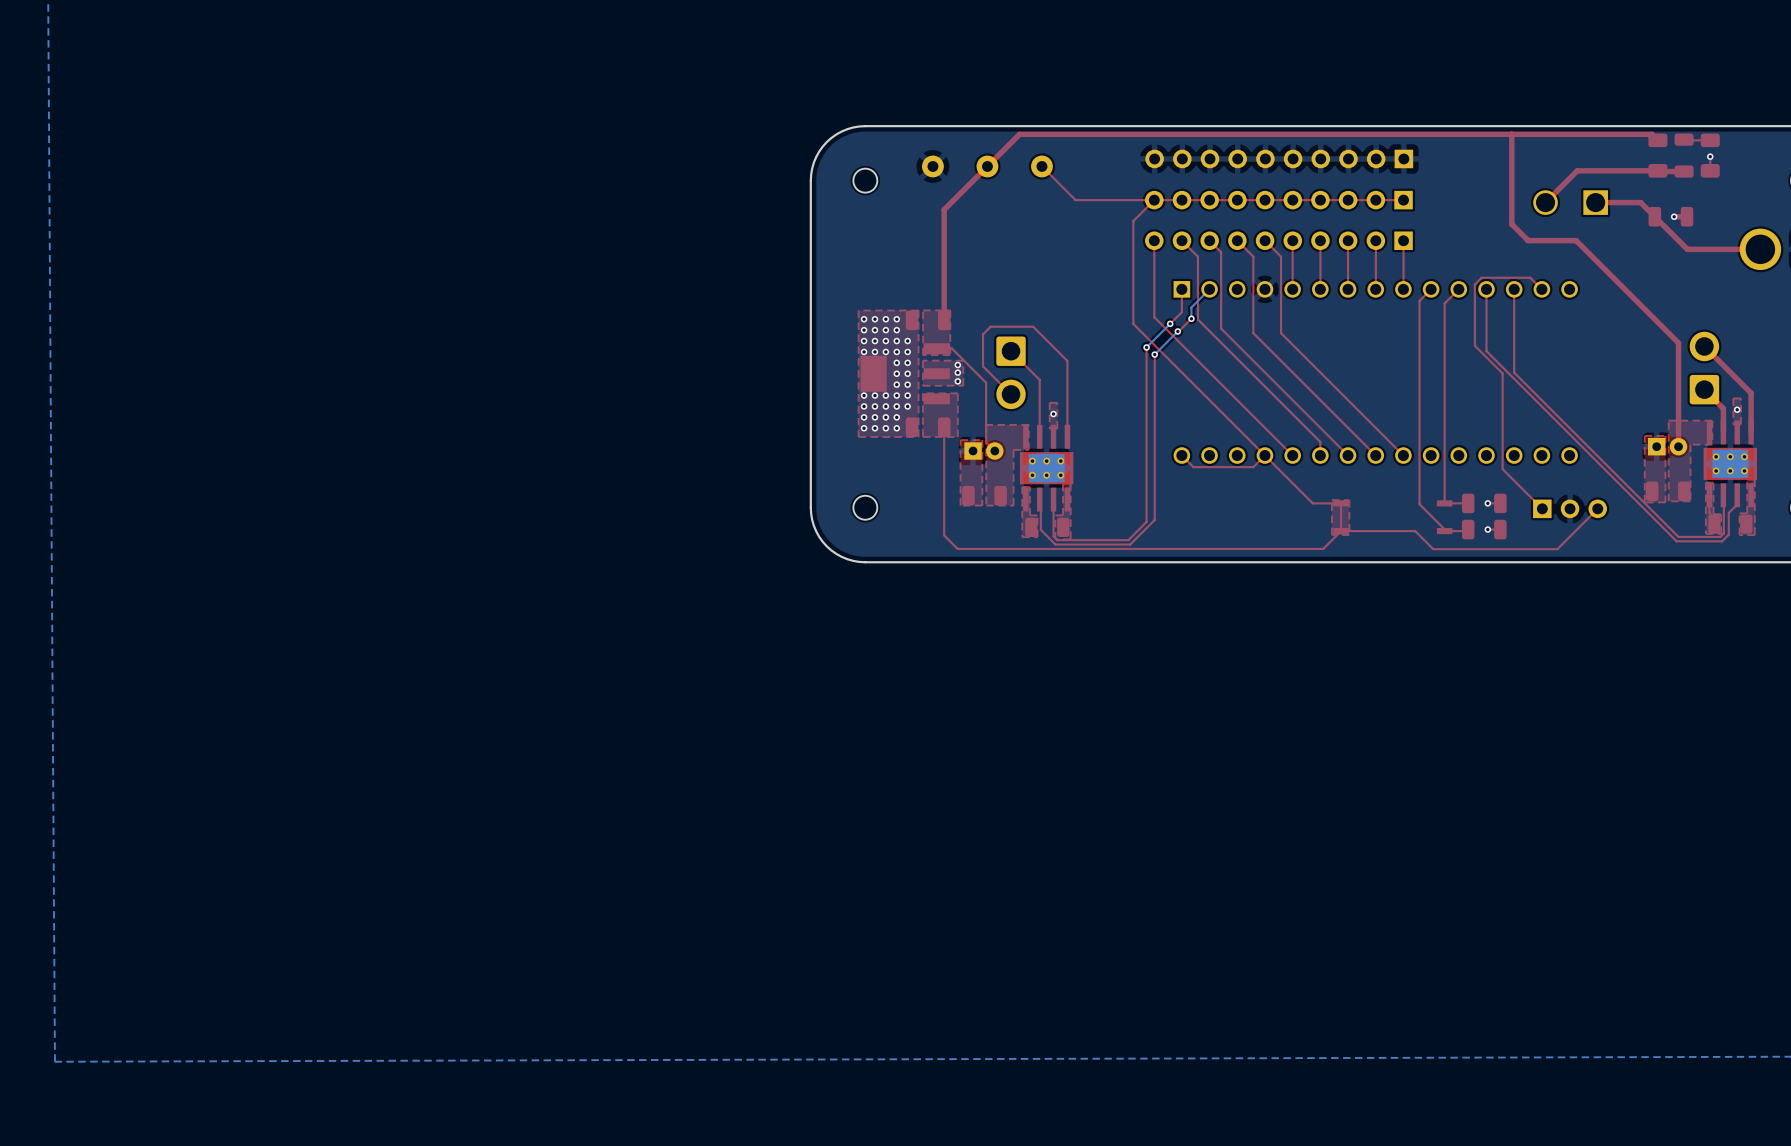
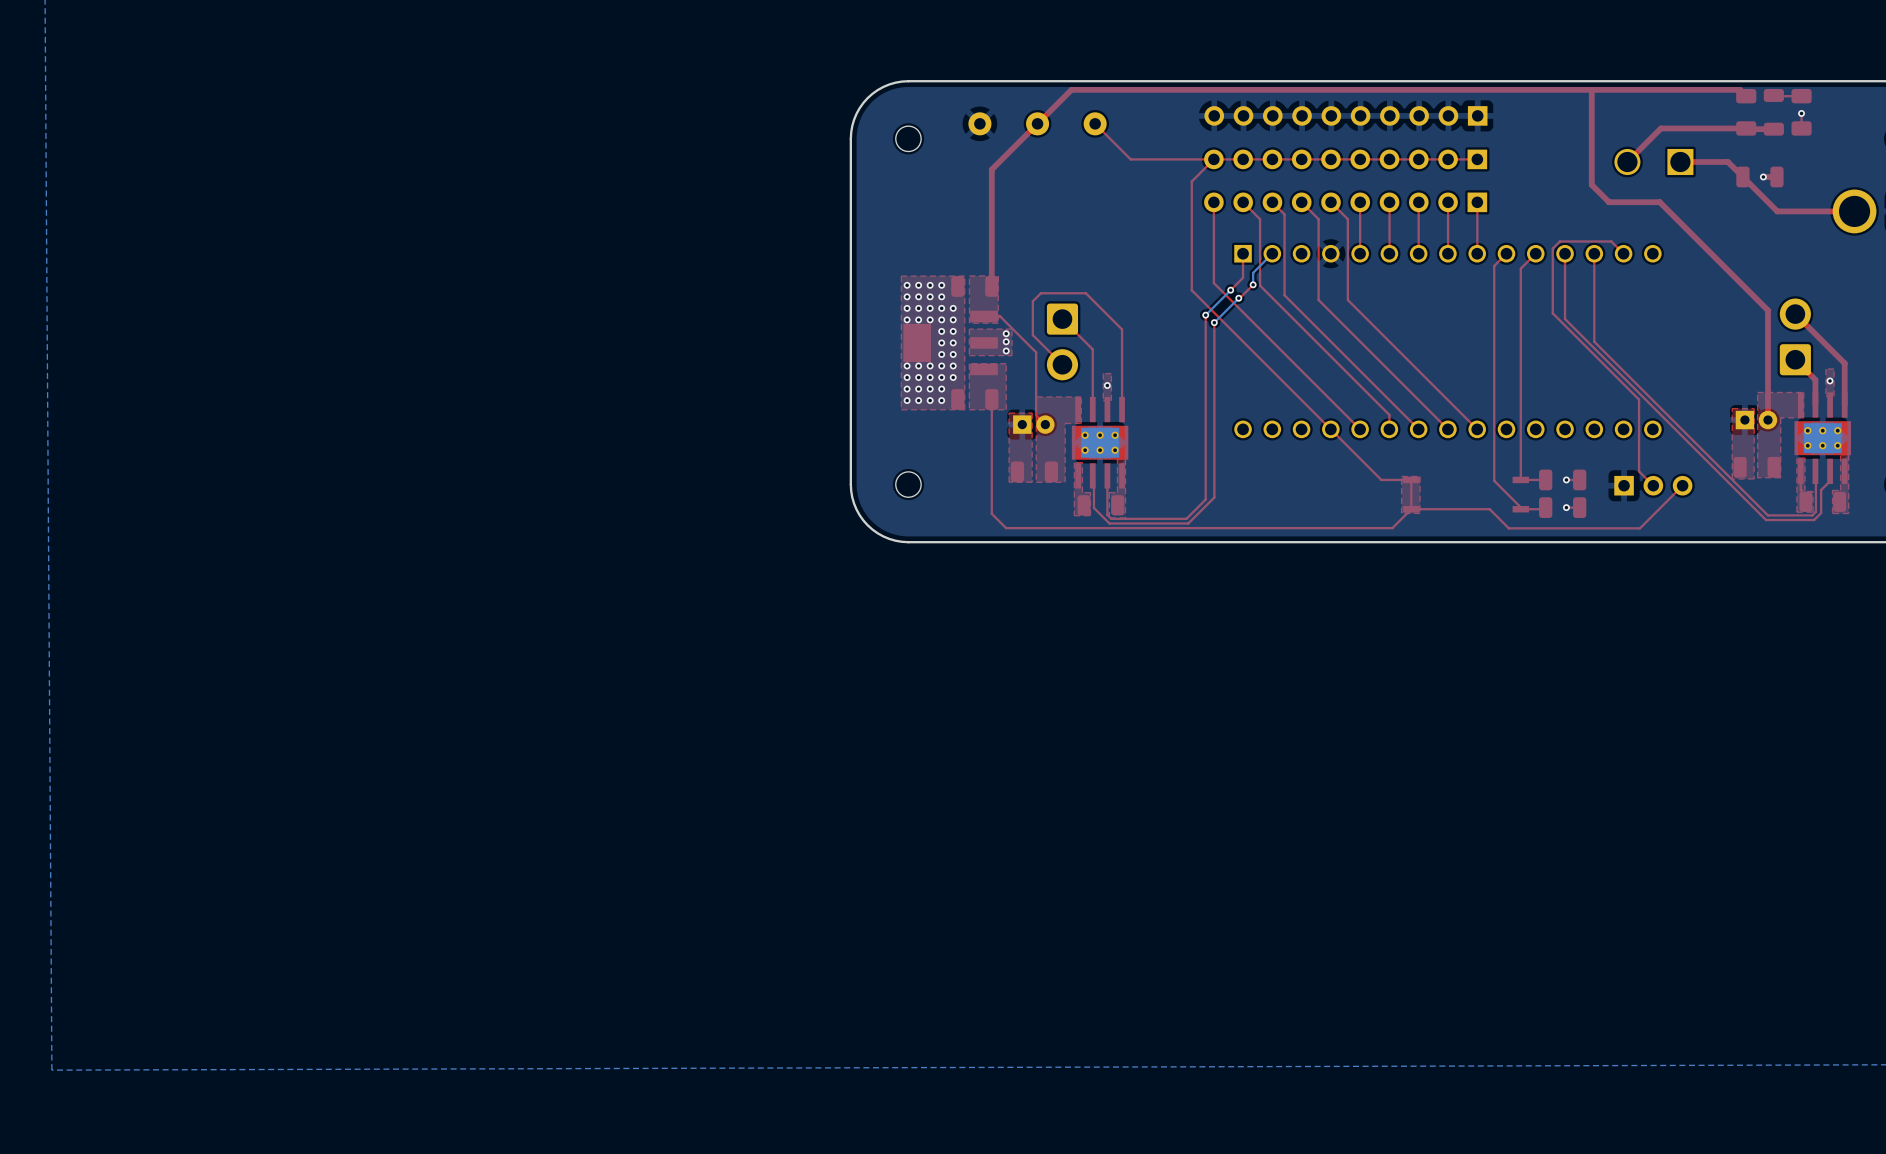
top track: (1502, 373) (1502, 469) (1542, 508) -> (1582, 342) (1639, 399) (1639, 471) (1653, 485)
top track: (1264, 455) (1253, 467) (1193, 467) (1181, 455) -> none

